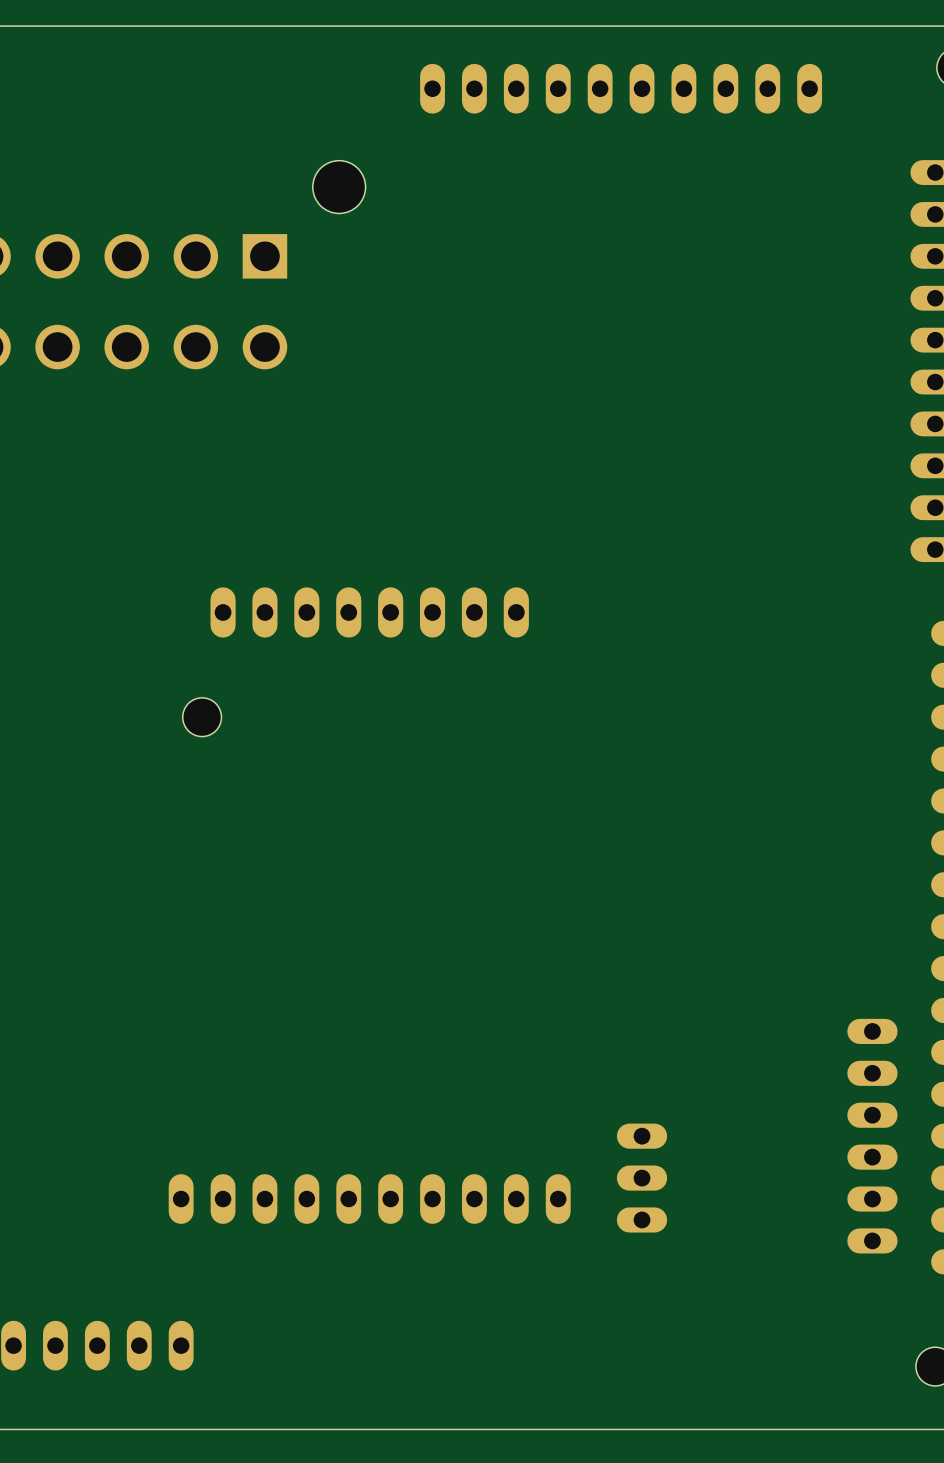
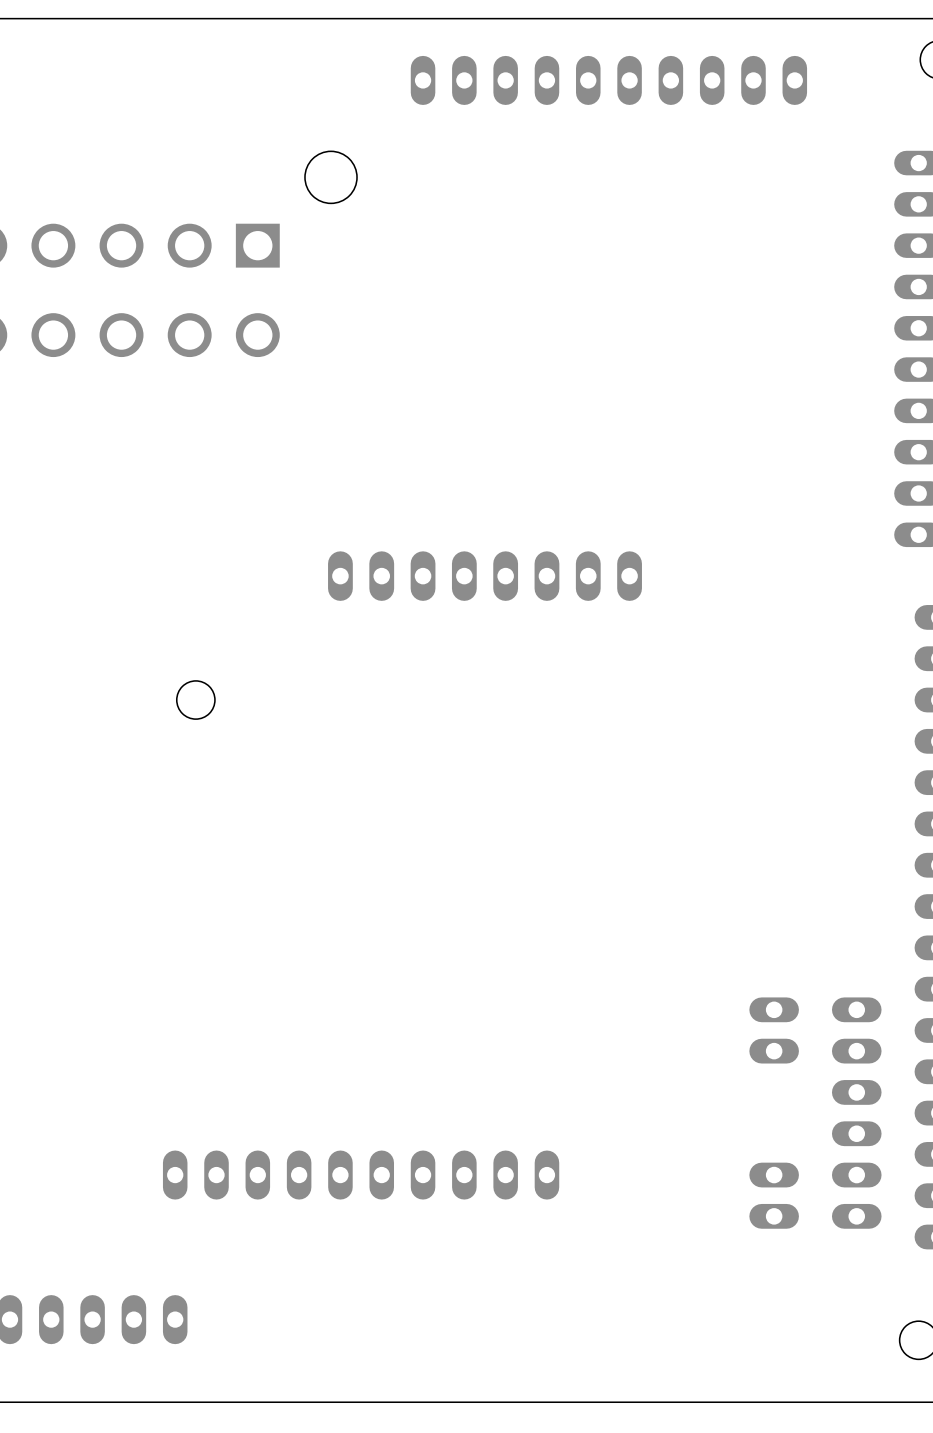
part position: (369, 612) -> (485, 576)
part: none -> (774, 1030)
part: (642, 1178) -> none
part: none -> (774, 1195)

